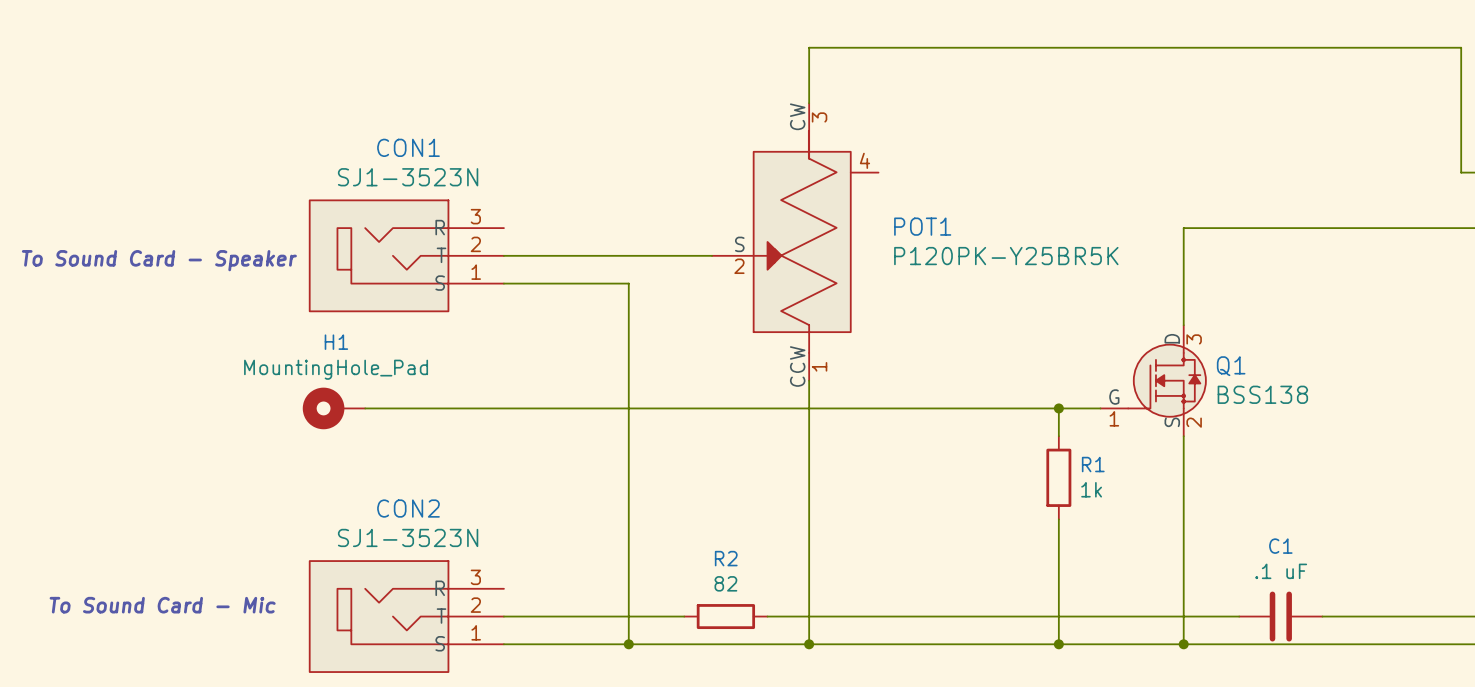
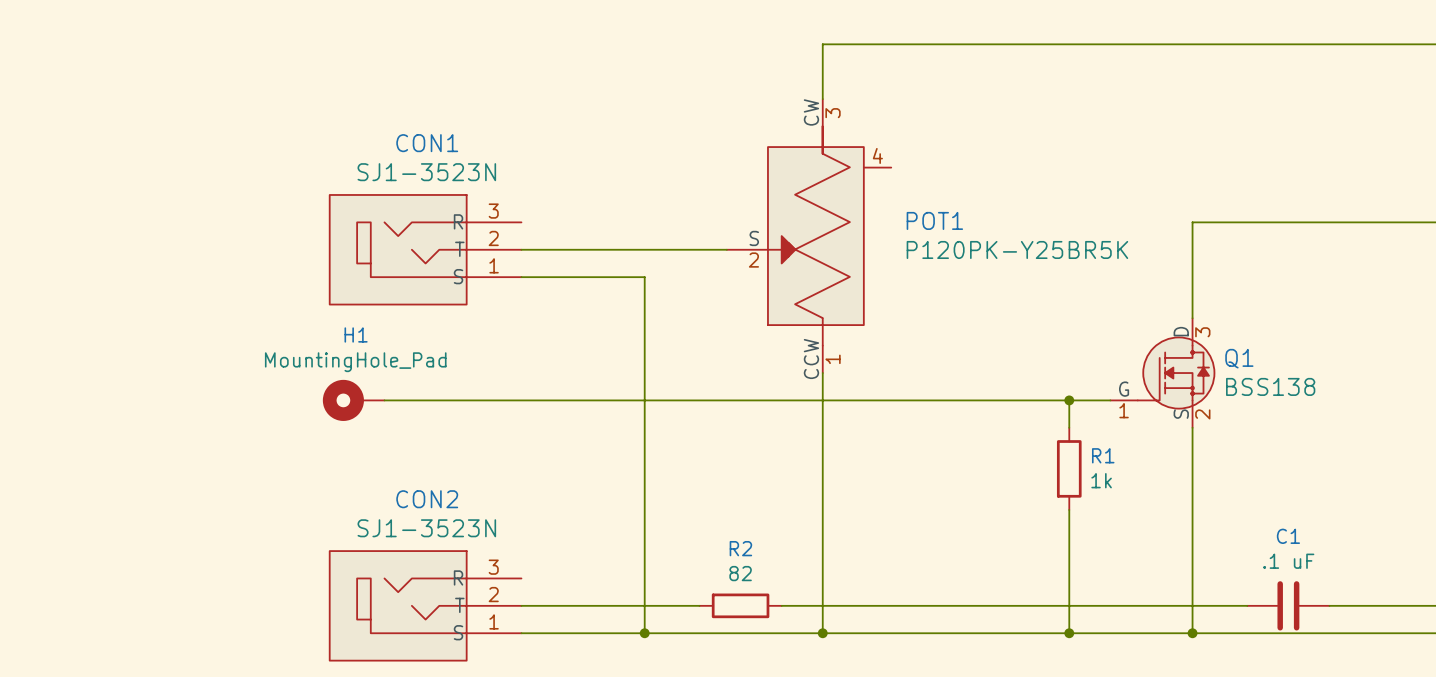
text: To Sound Card - Speaker (159, 260) -> none
text: To Sound Card - Mic (162, 605) -> none

